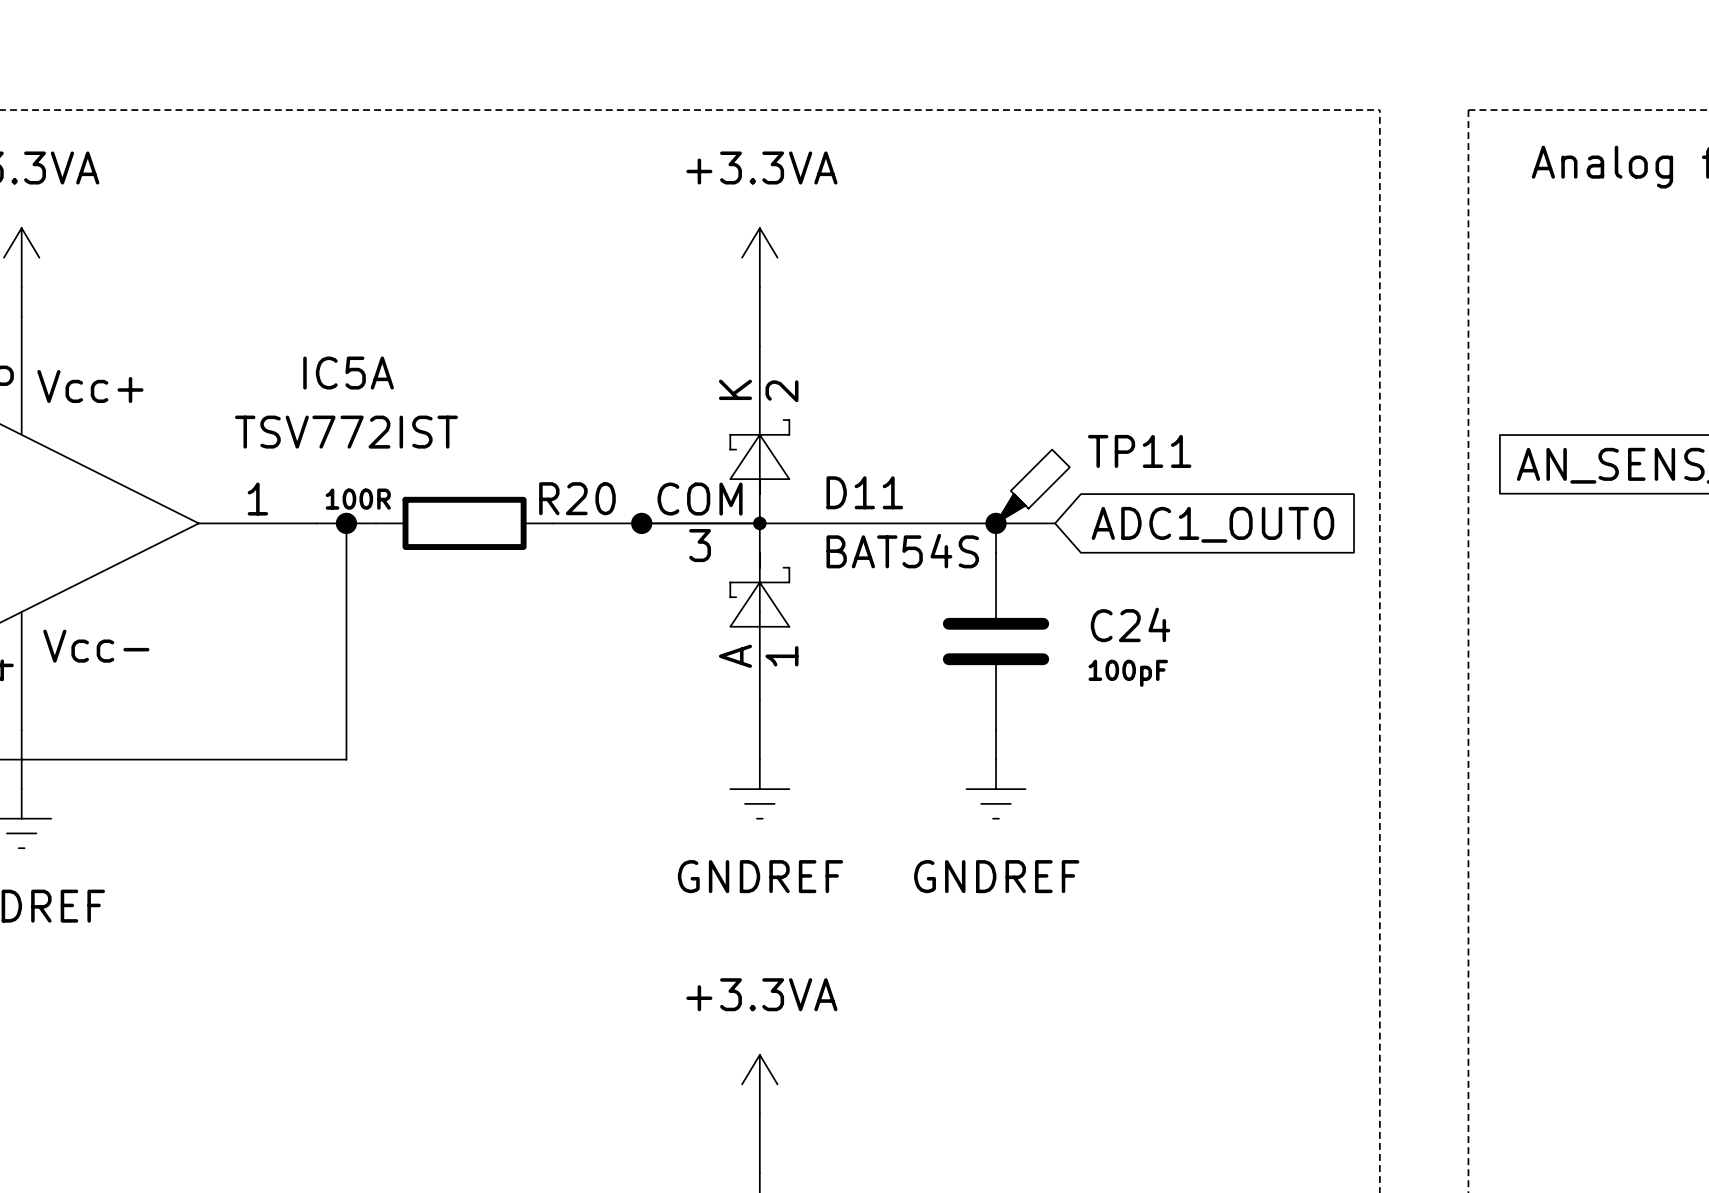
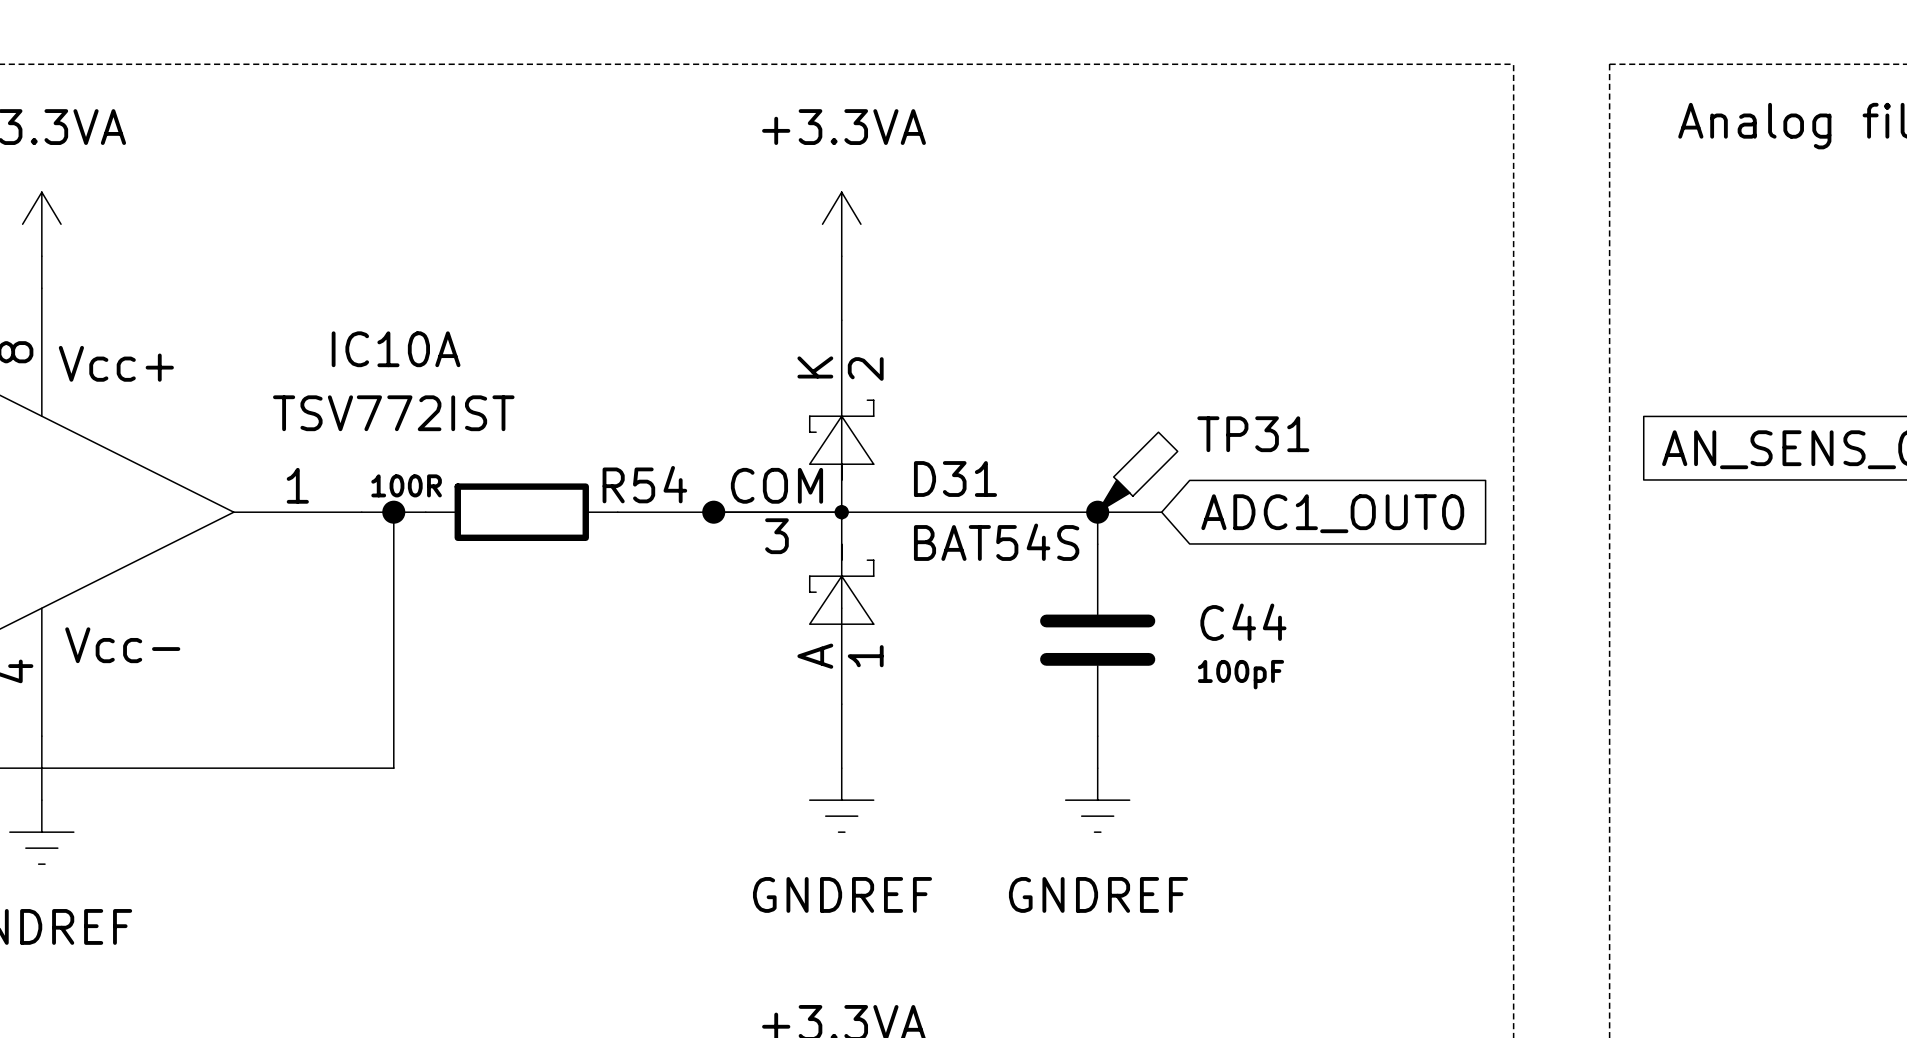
IC5A name: IC5A (348, 373) -> IC10A (396, 349)
TP11 name: TP11 (1139, 451) -> TP31 (1253, 434)
D11 name: D11 (864, 492) -> D31 (955, 479)
R20 name: R20 (577, 498) -> R54 (644, 484)
C24 name: C24 (1130, 624) -> C44 (1243, 622)

